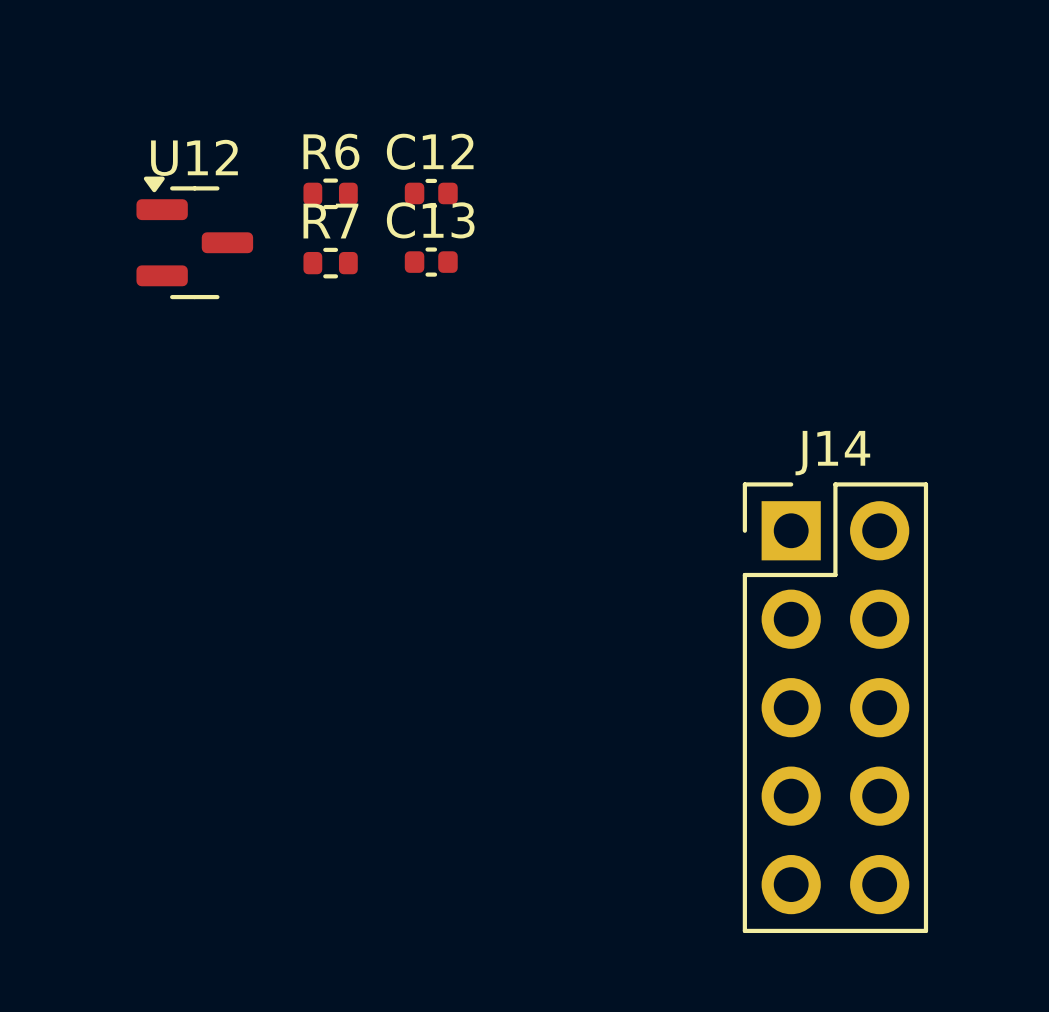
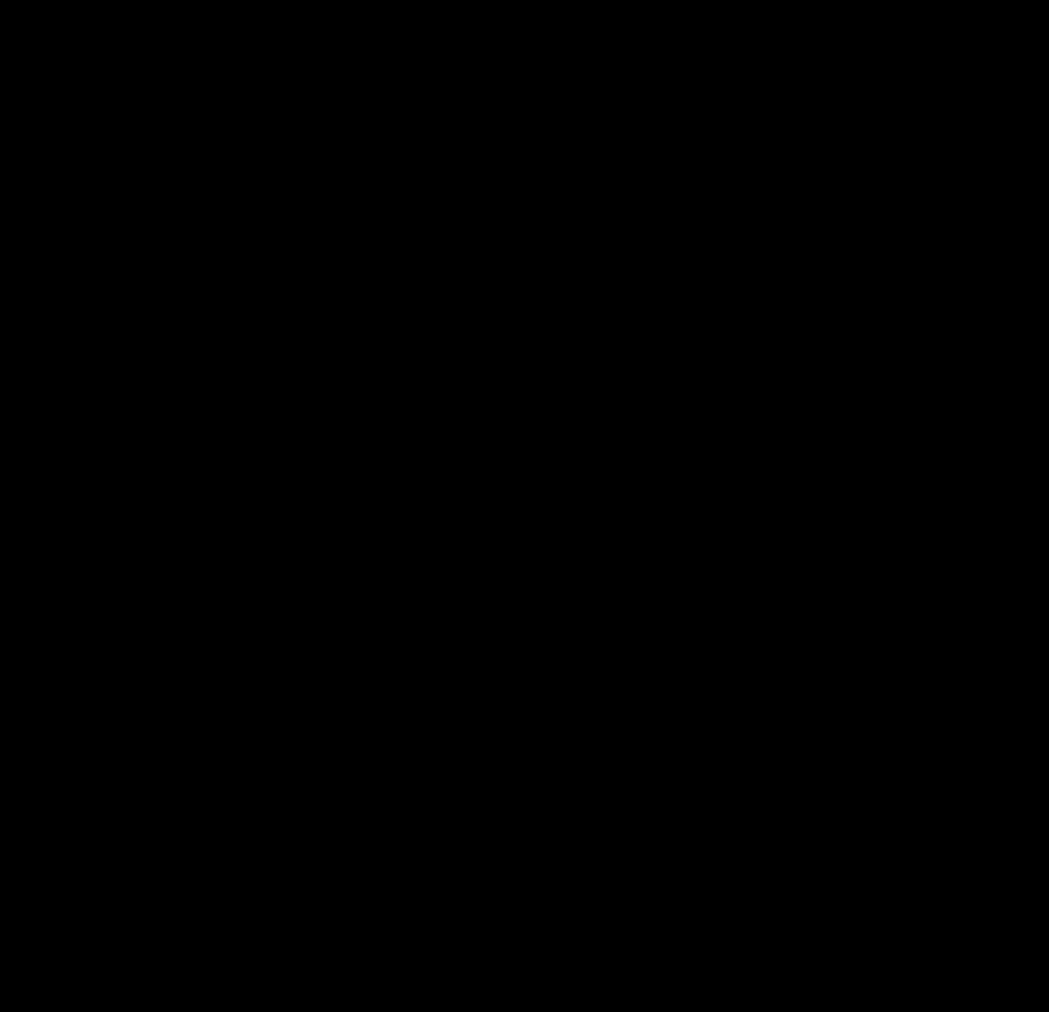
R6: (330, 193) -> none
C12: (431, 193) -> none
U12: (194, 237) -> none
C13: (431, 262) -> none
R7: (330, 263) -> none
J14: (835, 707) -> none

